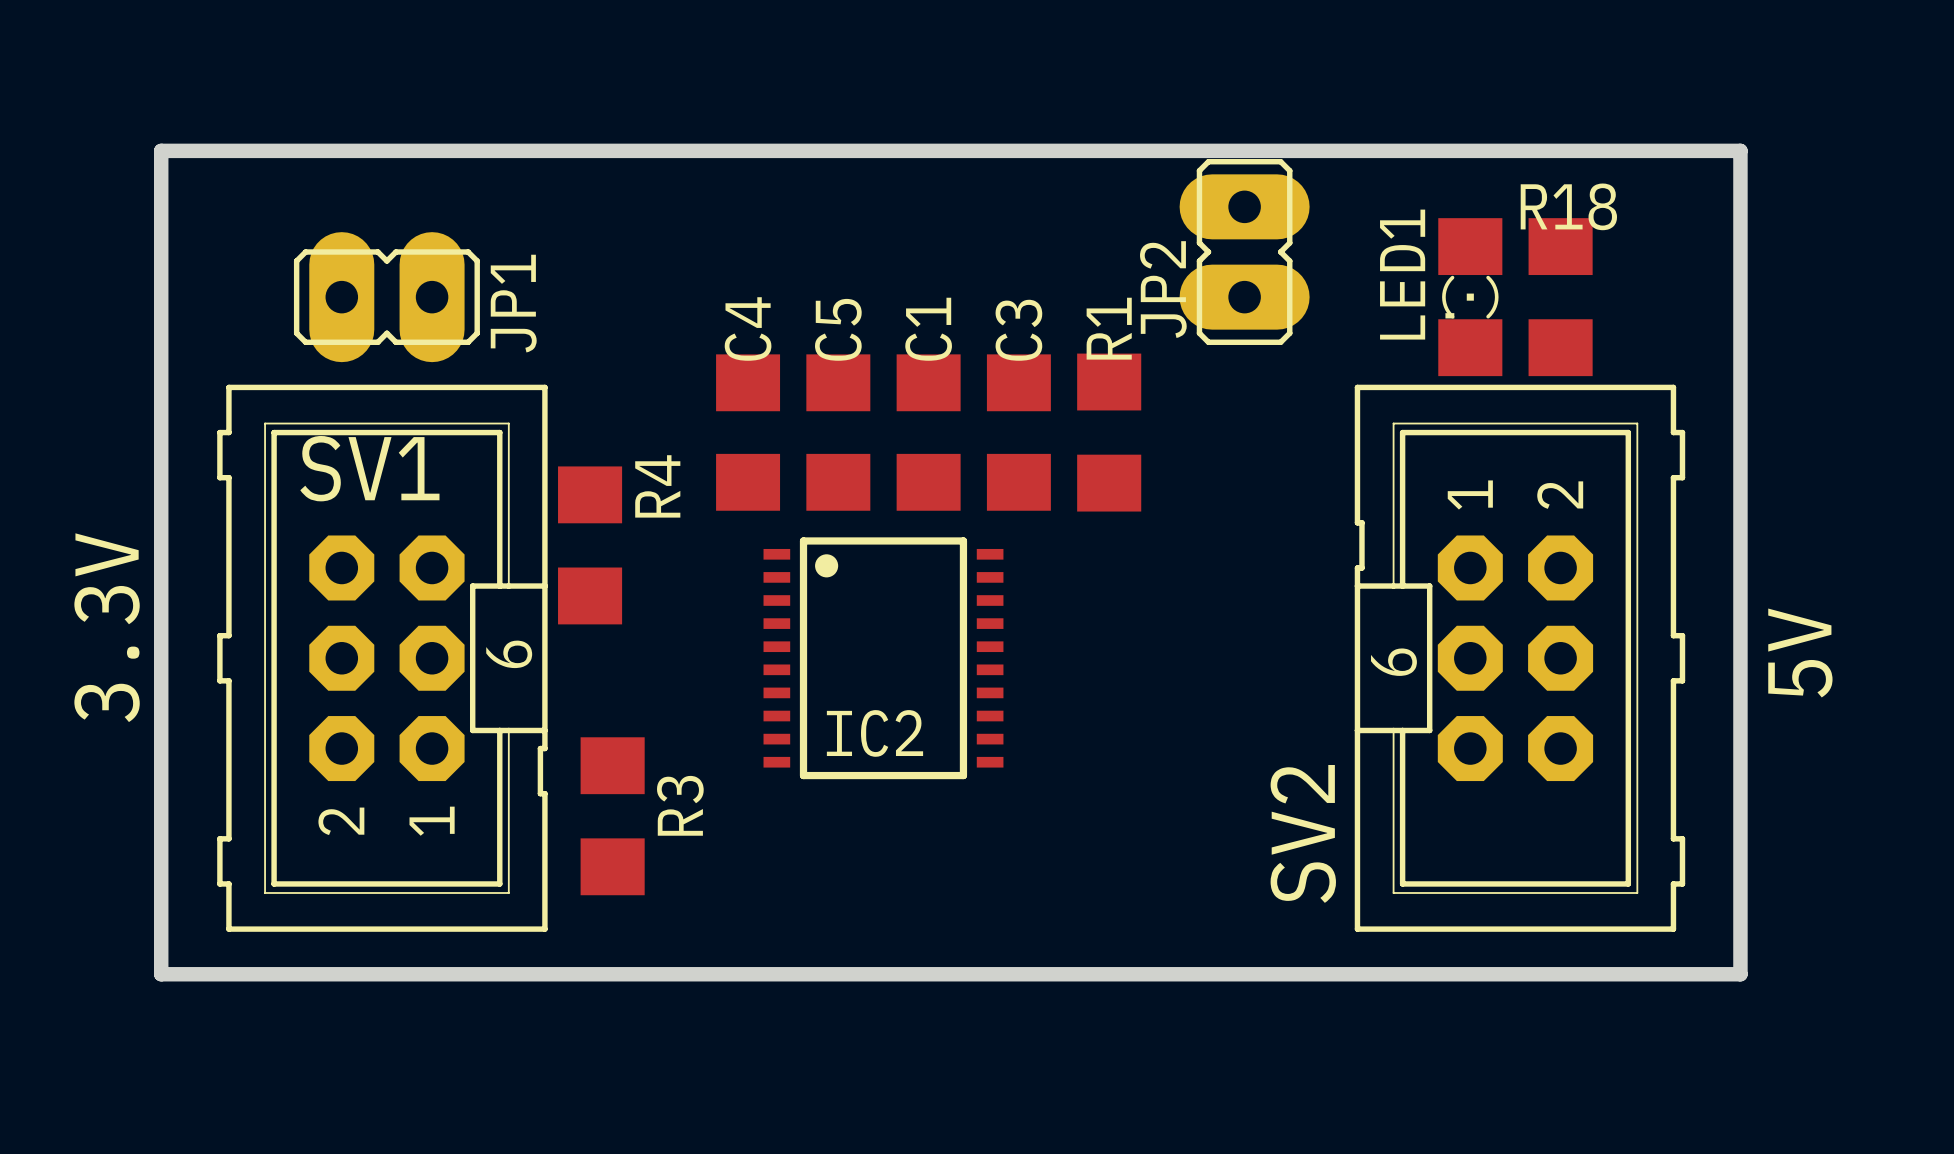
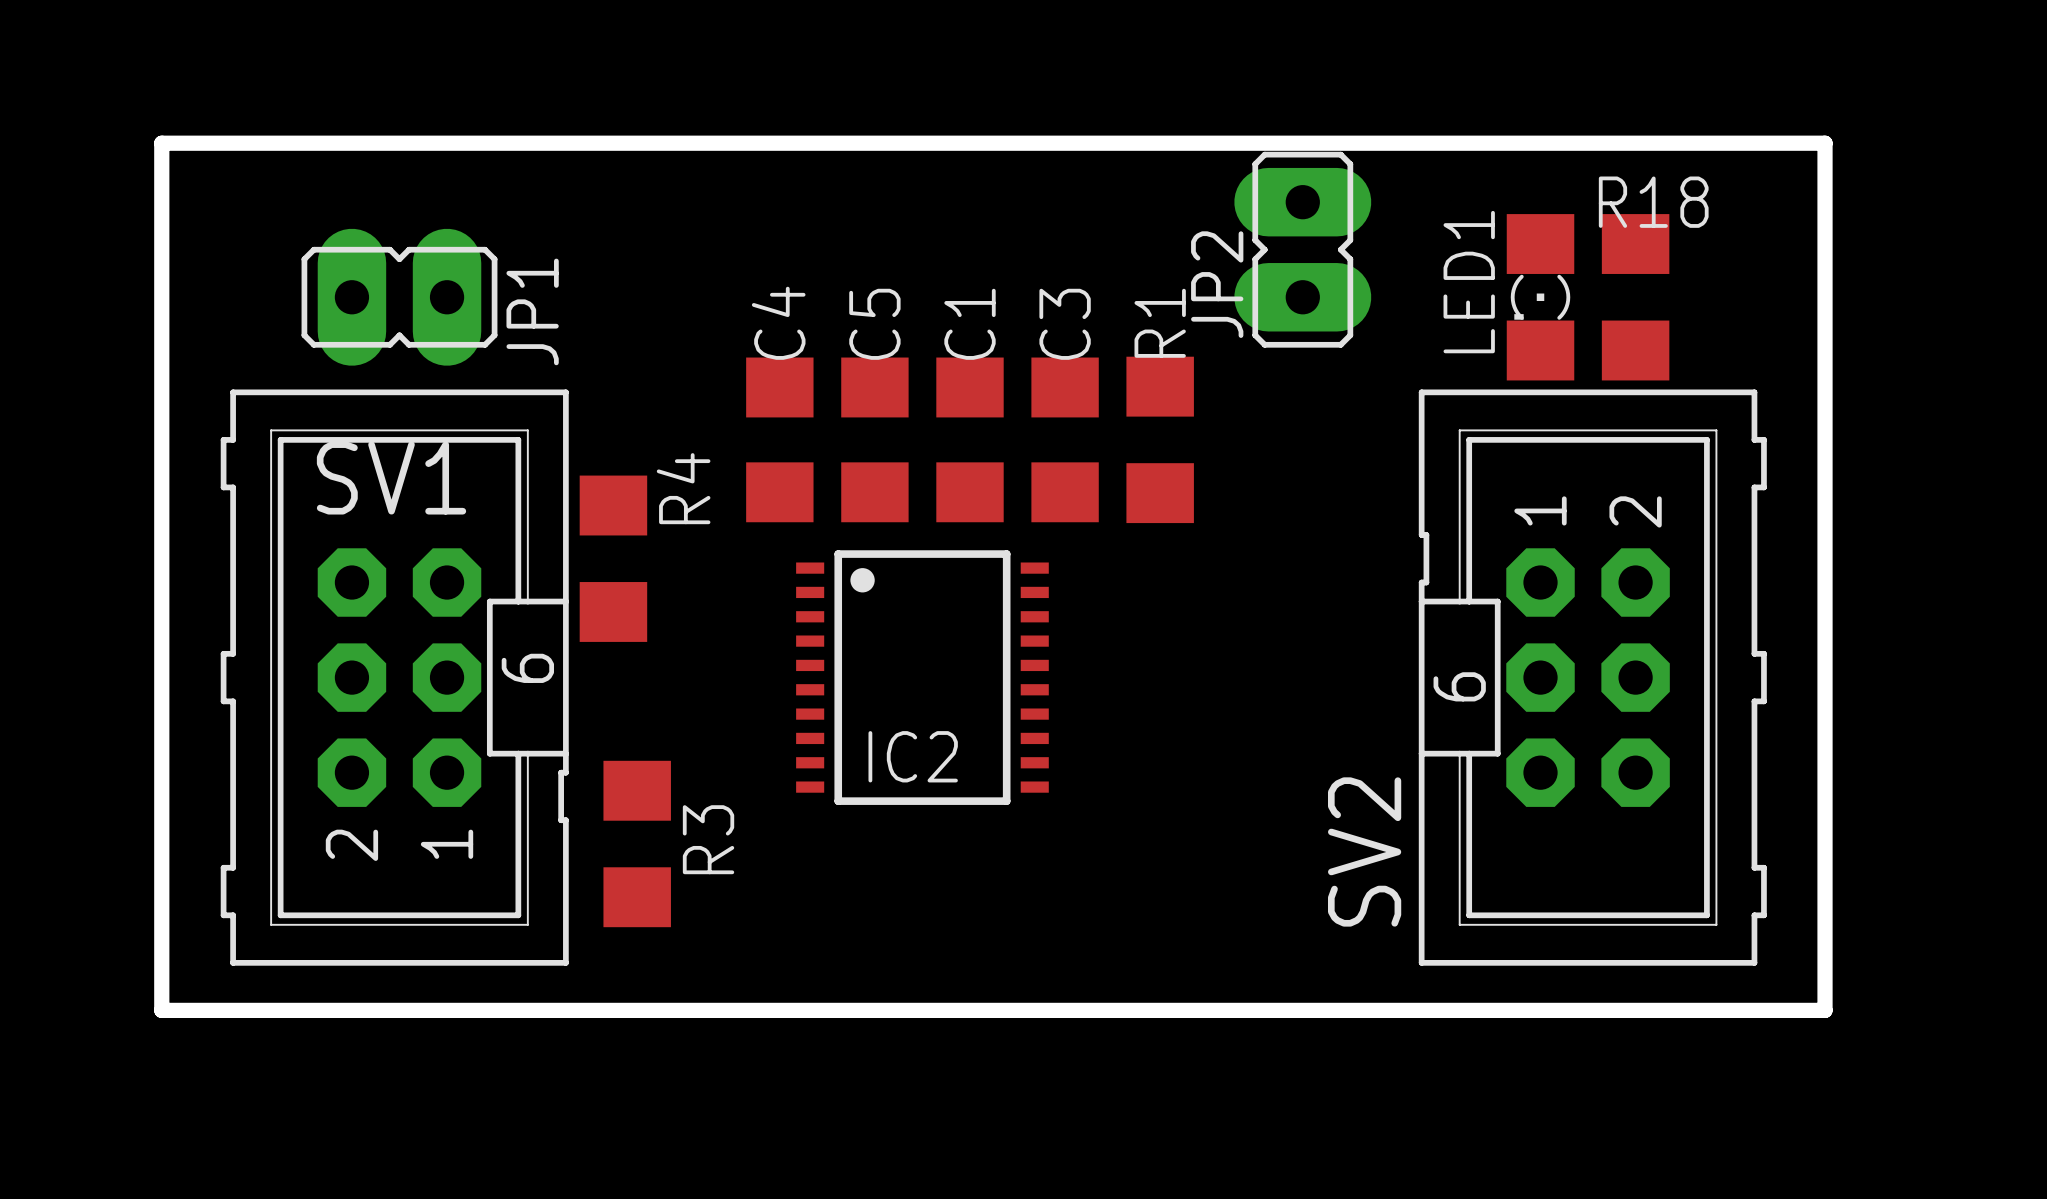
text: 3.3V (107, 627) -> none
text: 5V (1800, 653) -> none

